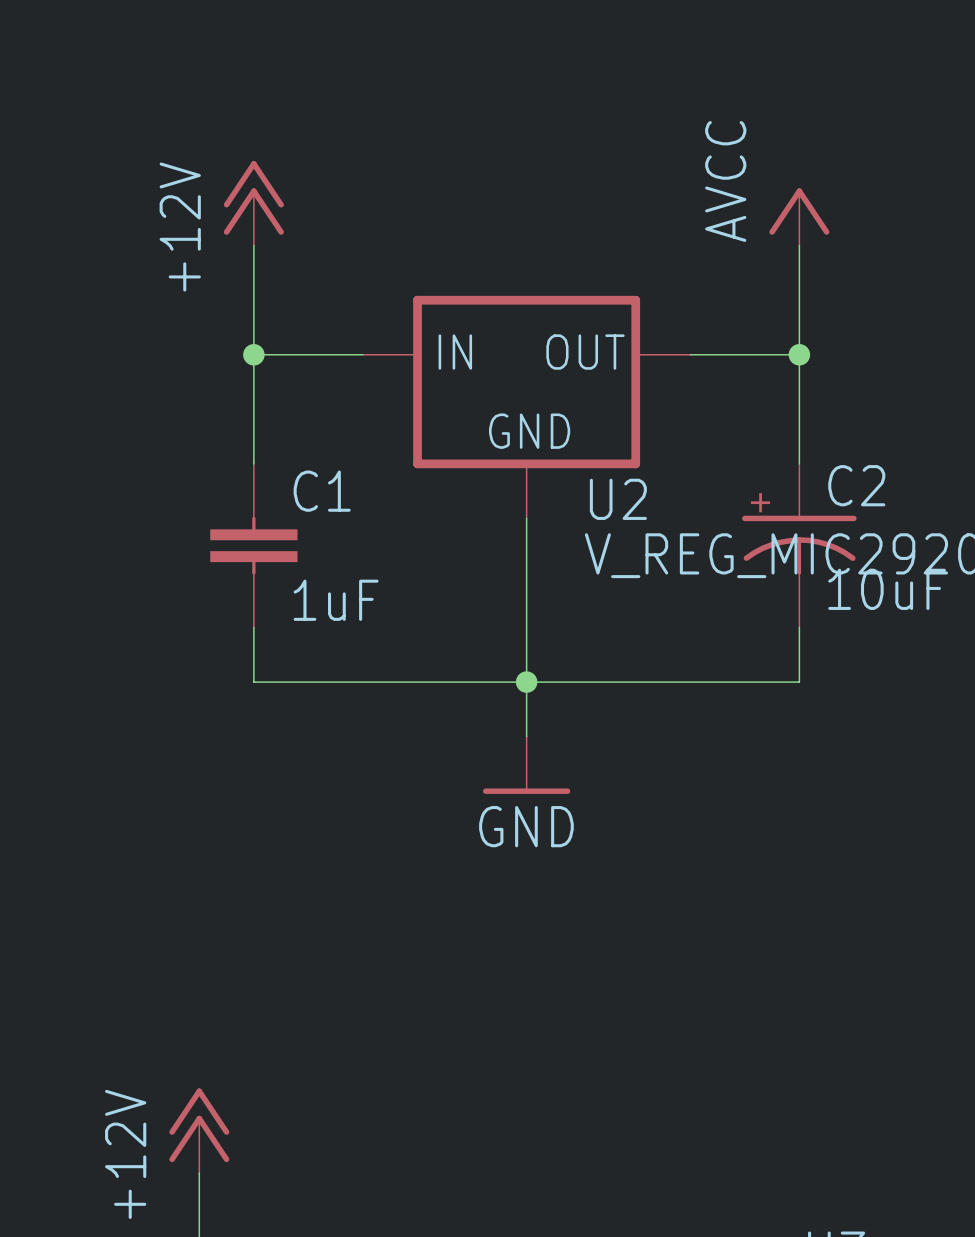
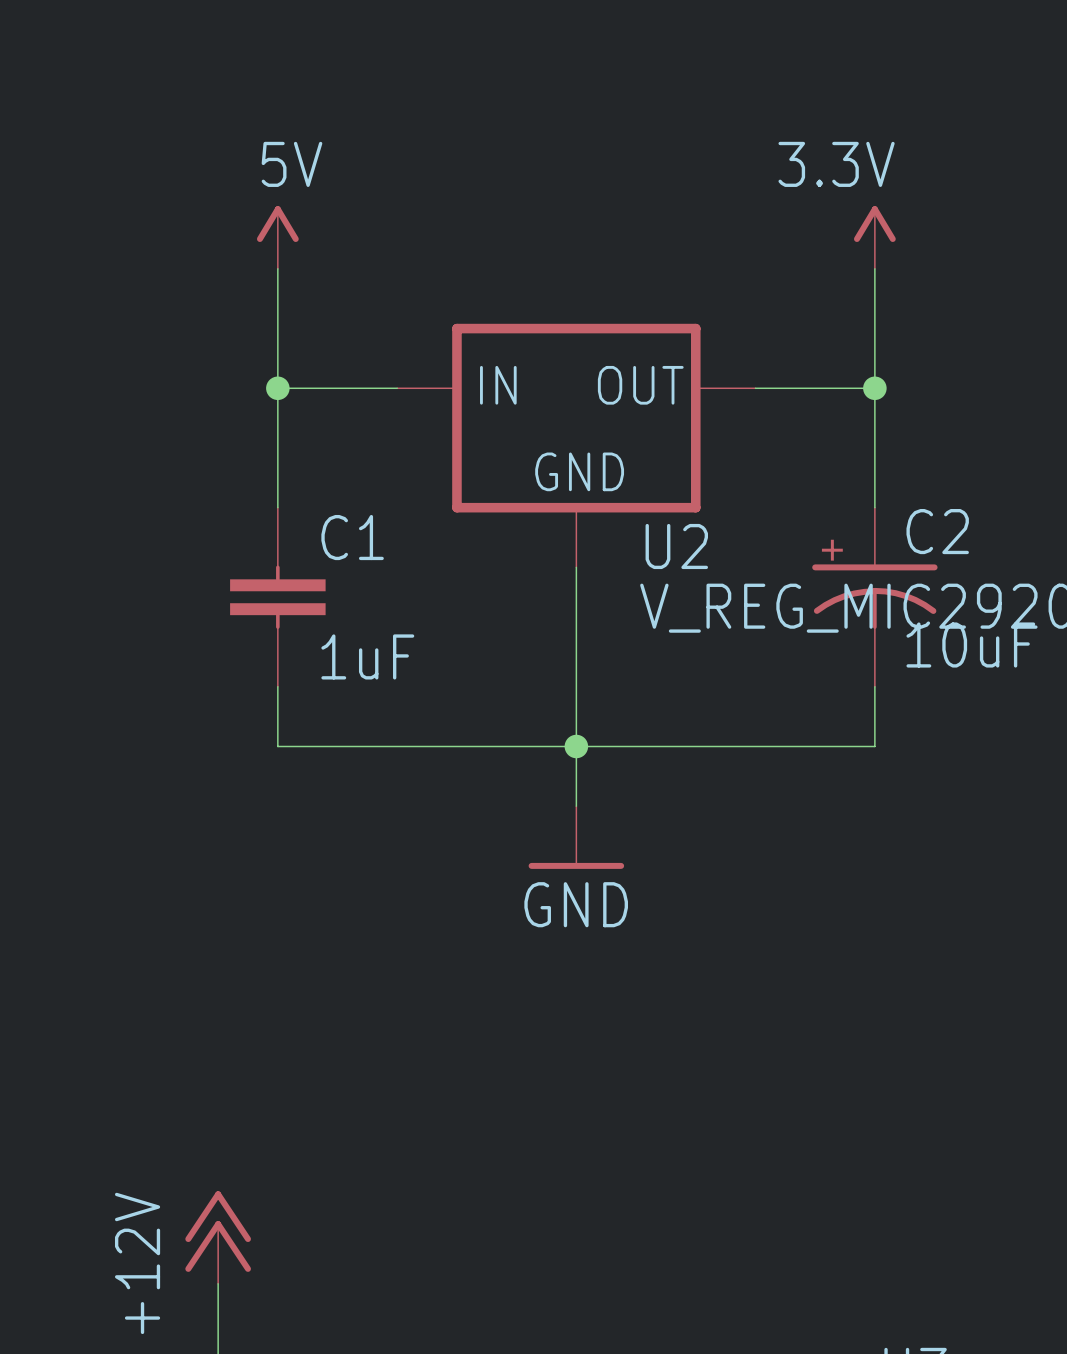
power symbol: +12V (253, 203) -> 5V (277, 237)
power symbol: AVCC (799, 217) -> 3.3V (874, 237)

